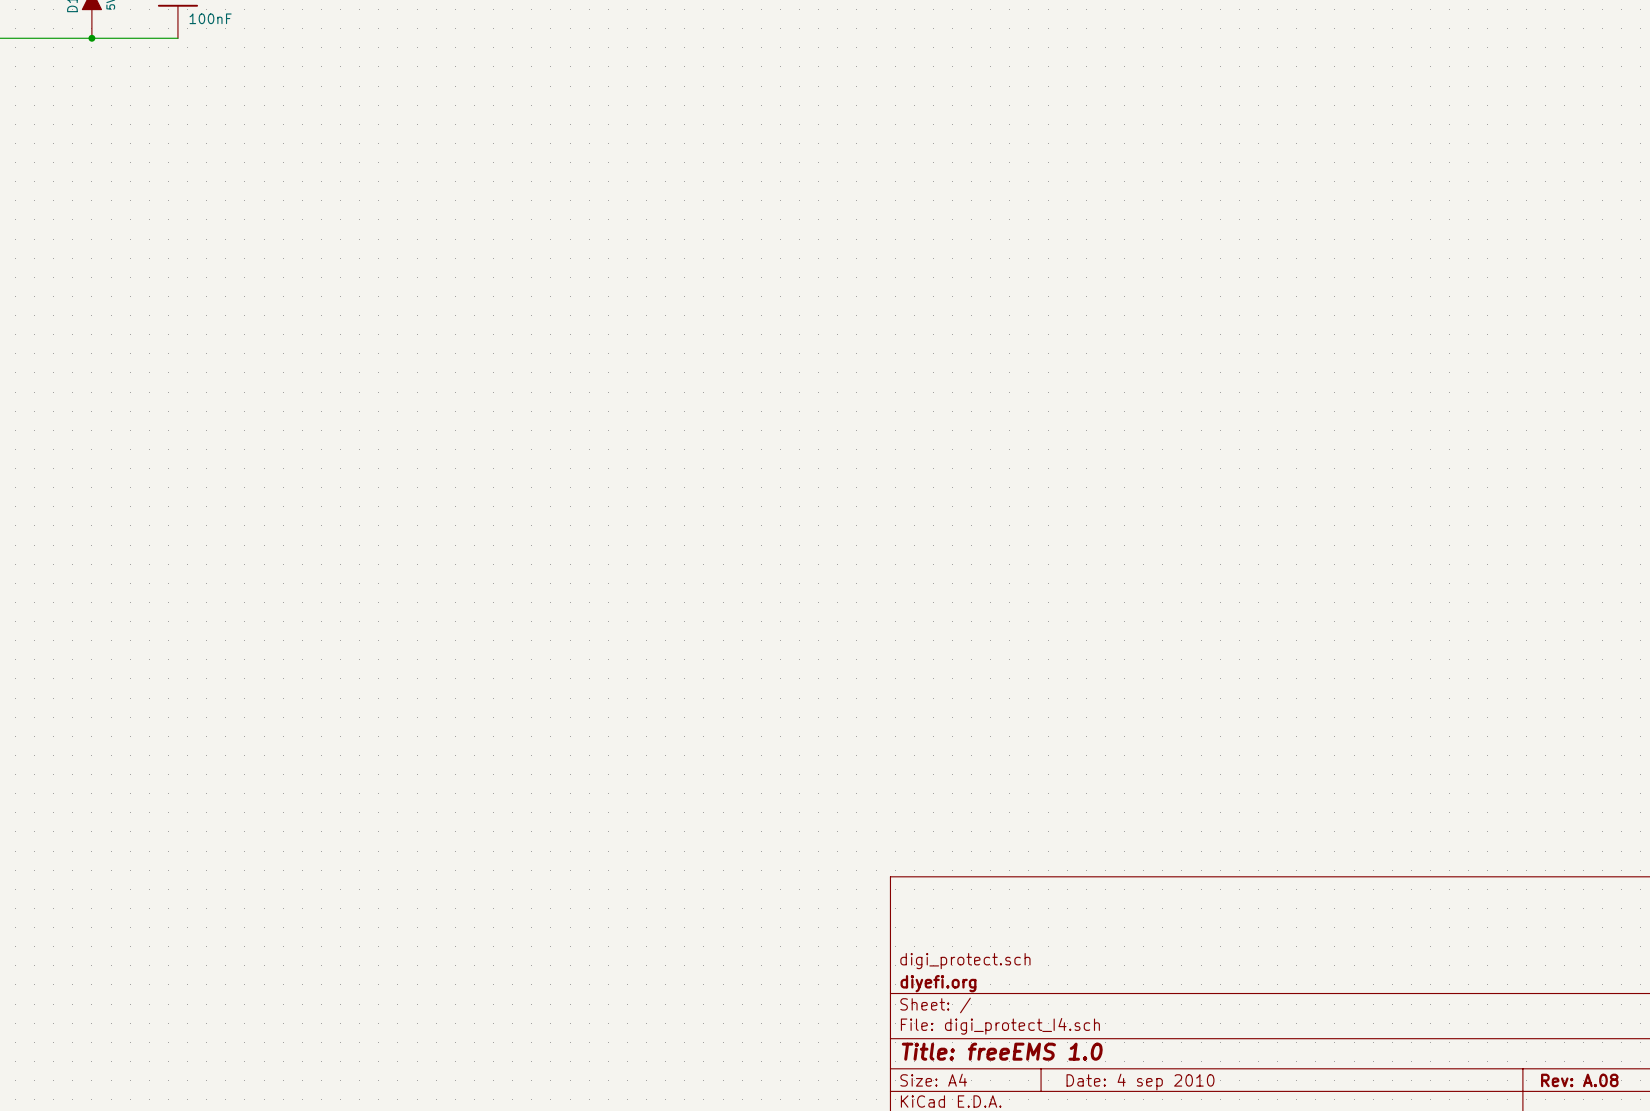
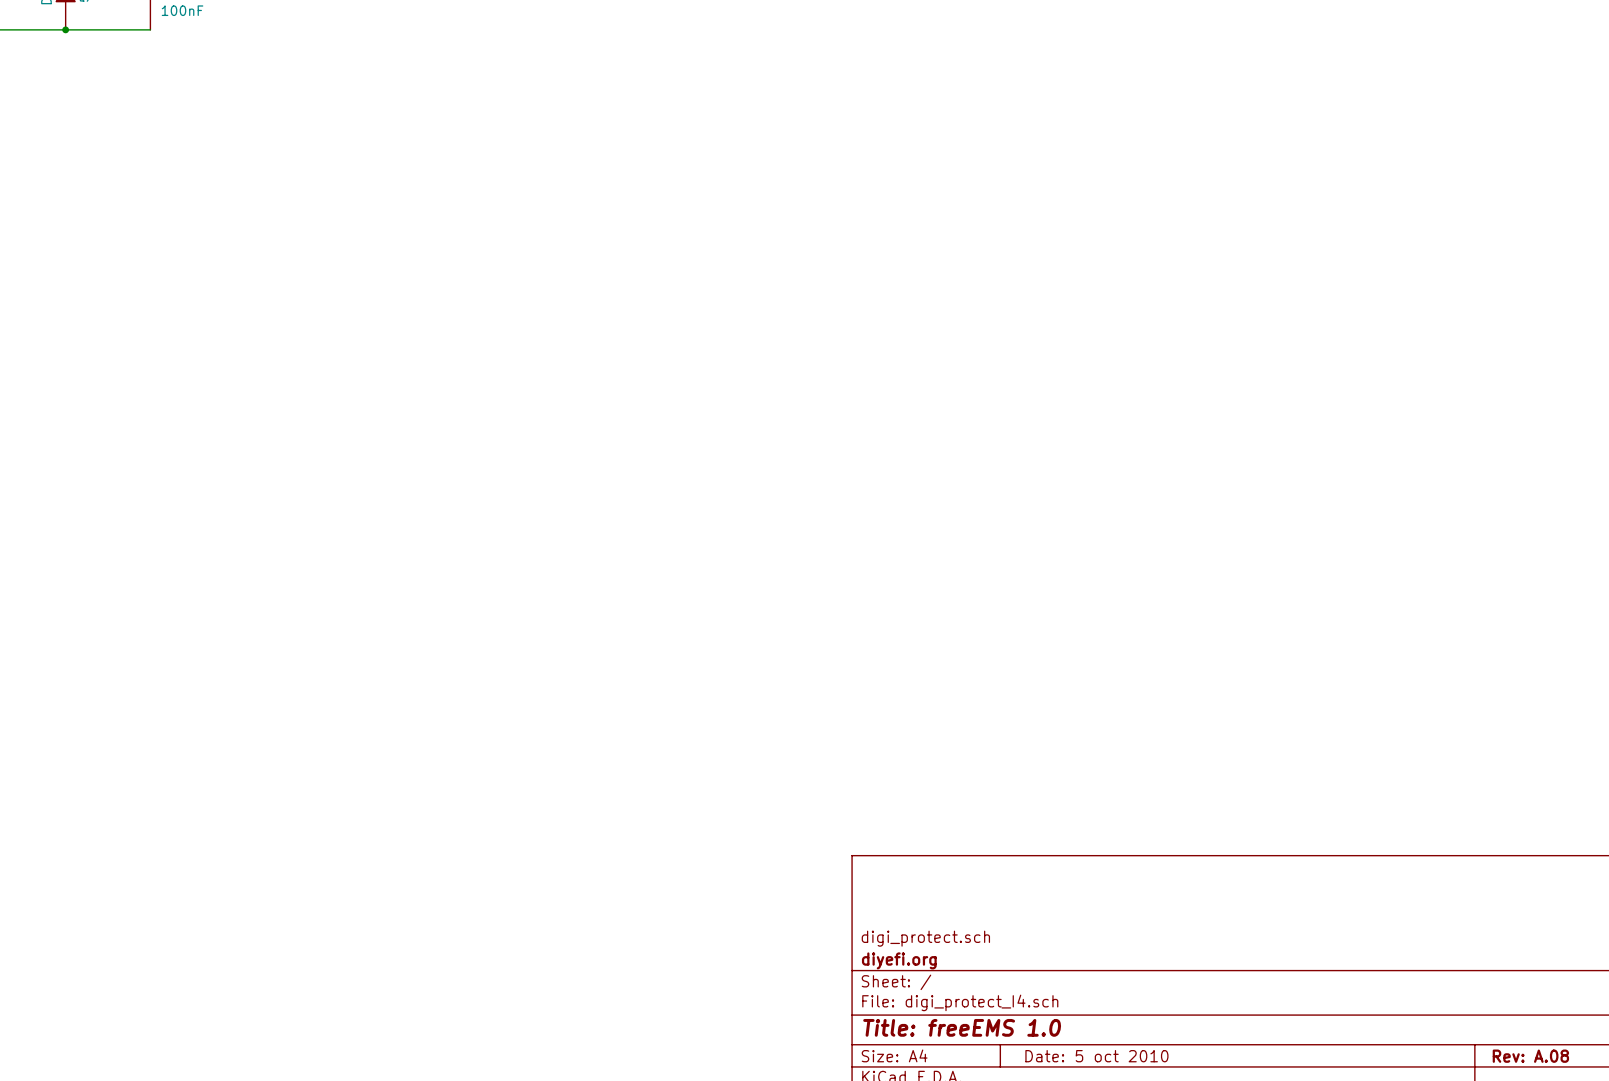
title block: Date: 4 sep 2010 (1140, 1082) -> Date: 5 oct 2010 (1096, 1056)

